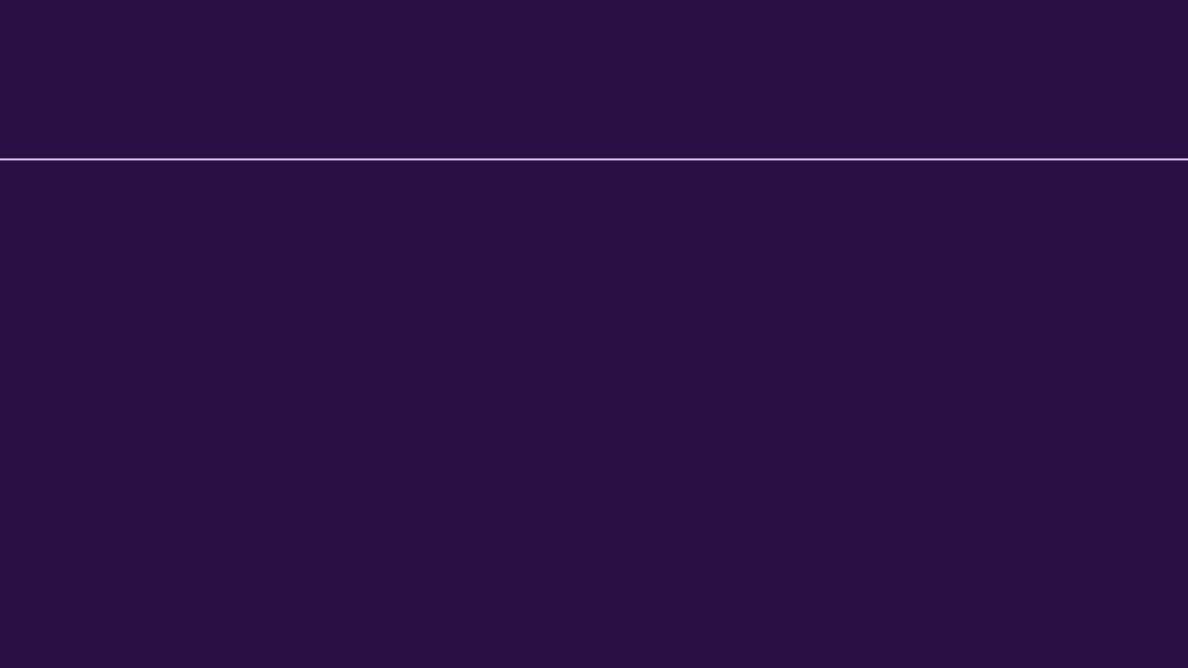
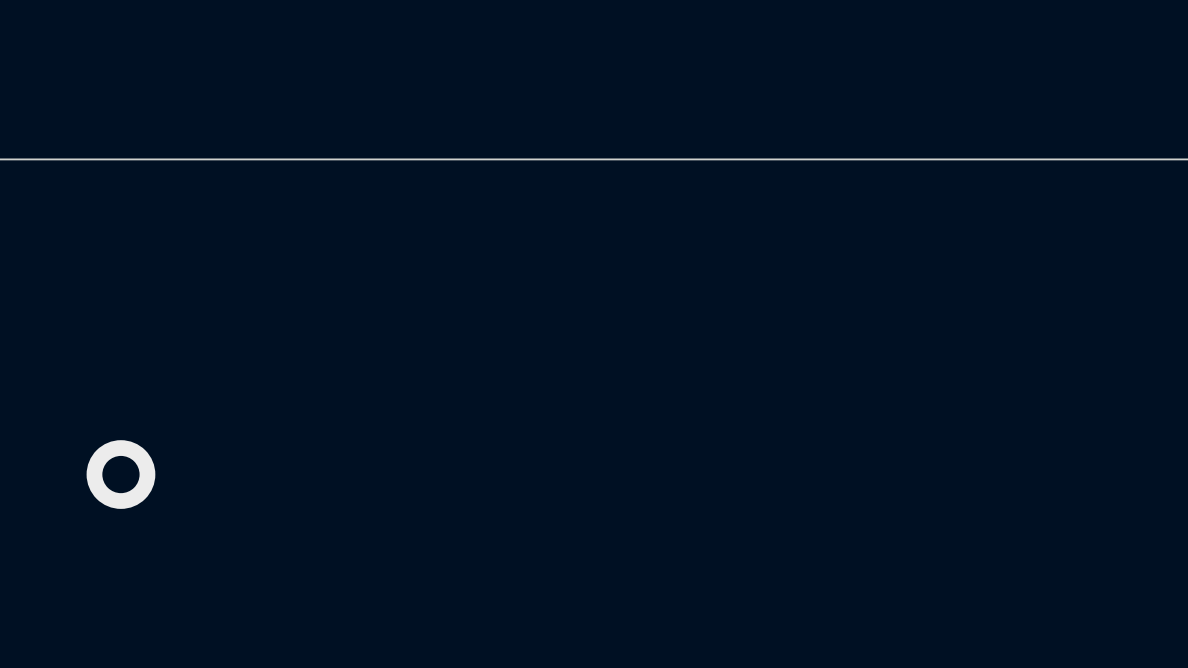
via: none -> (120, 474)

